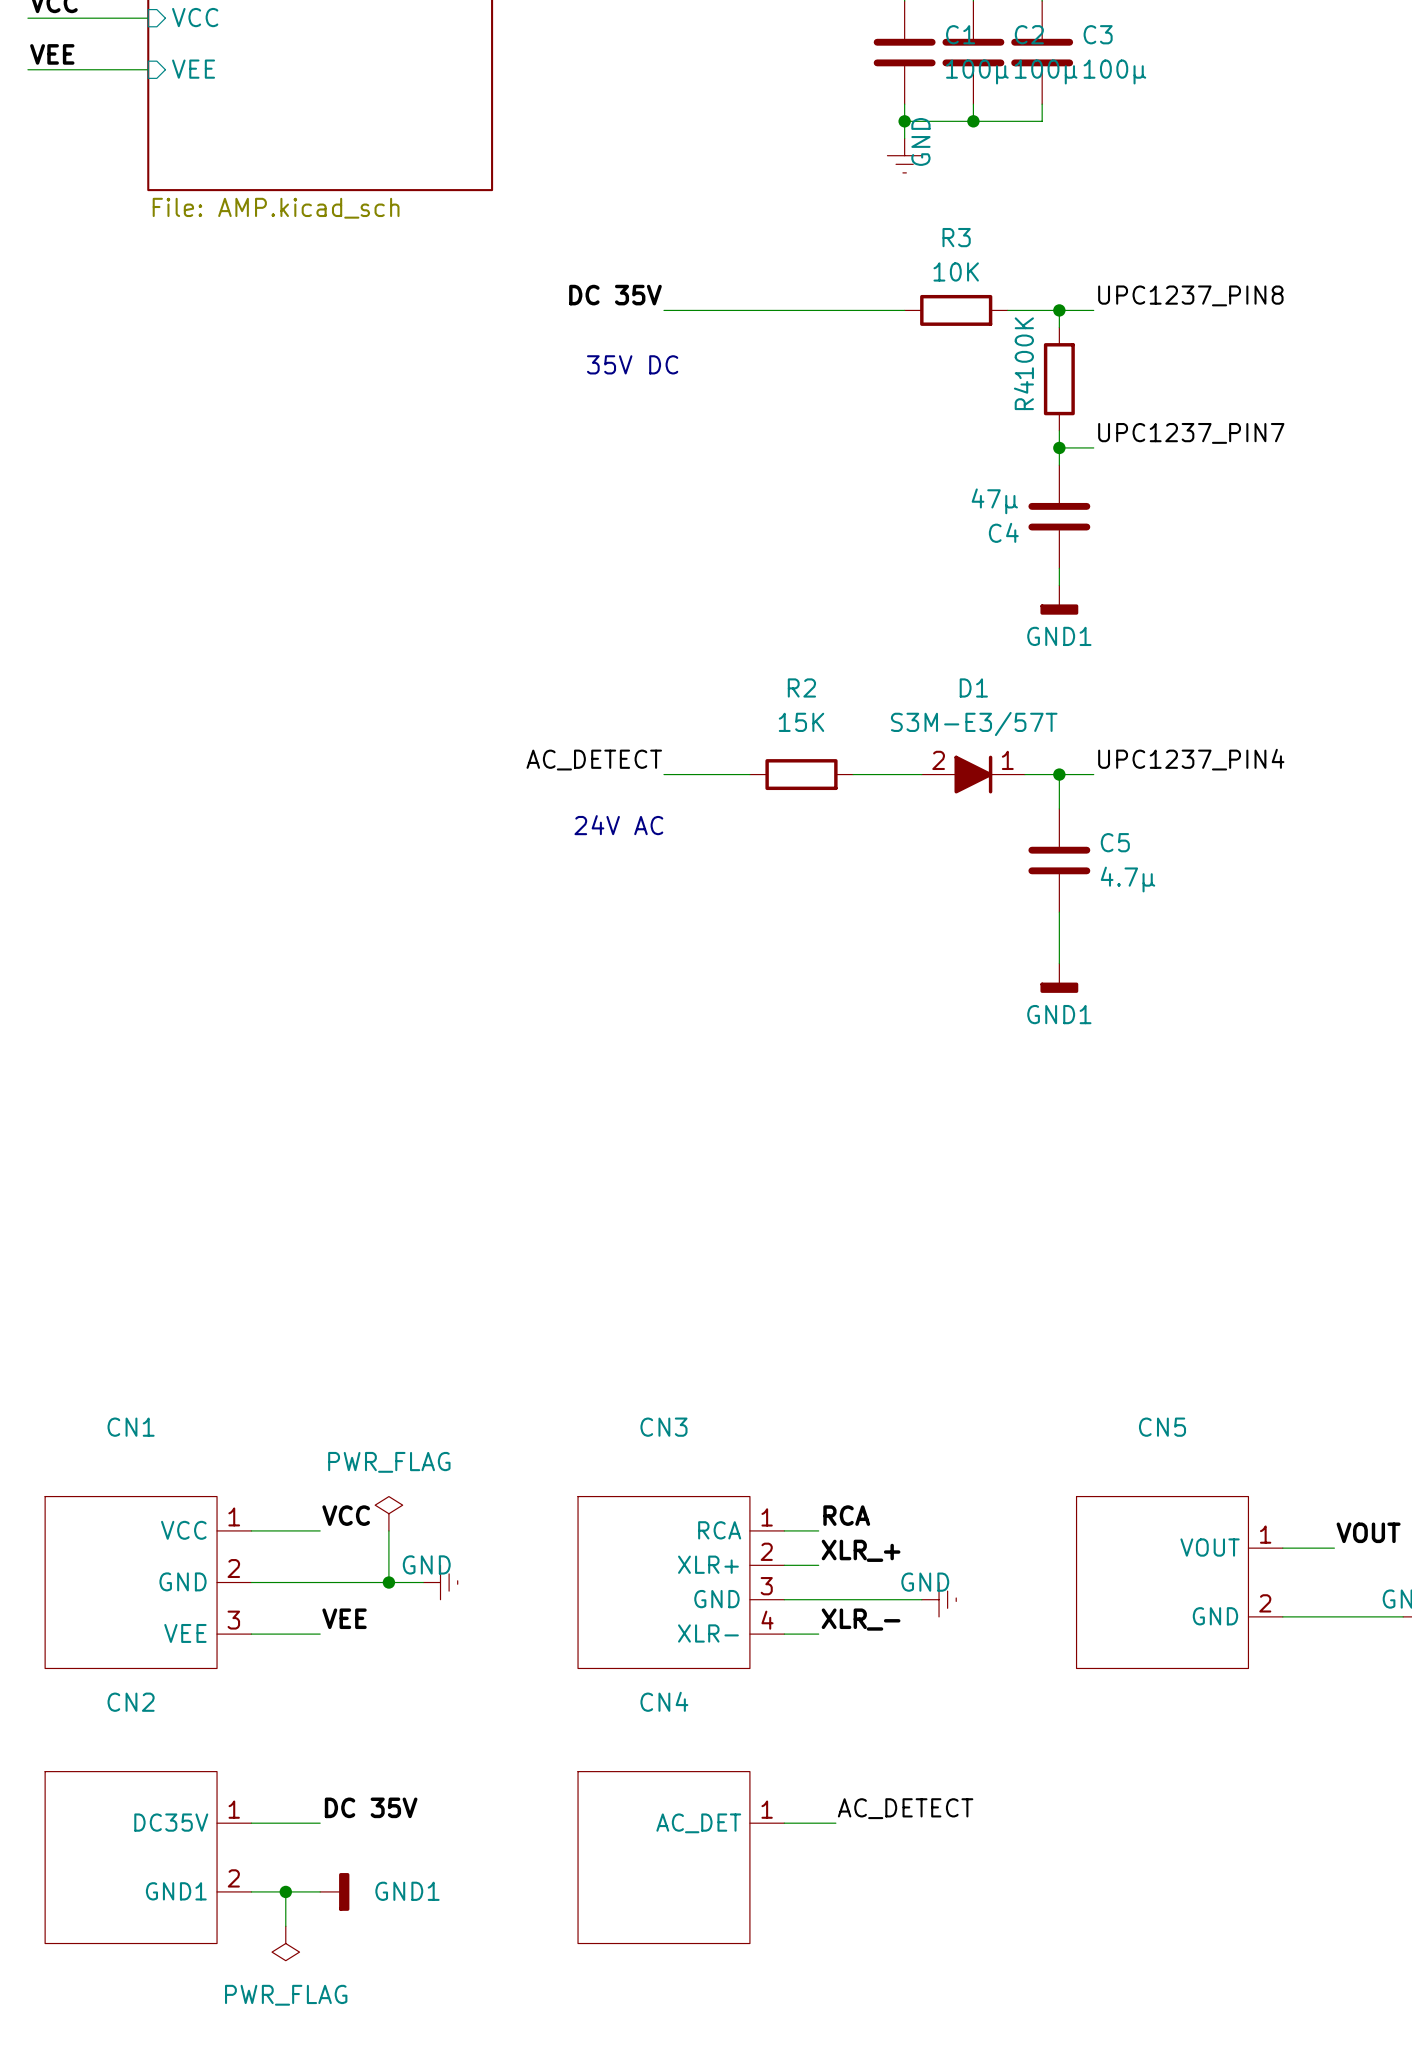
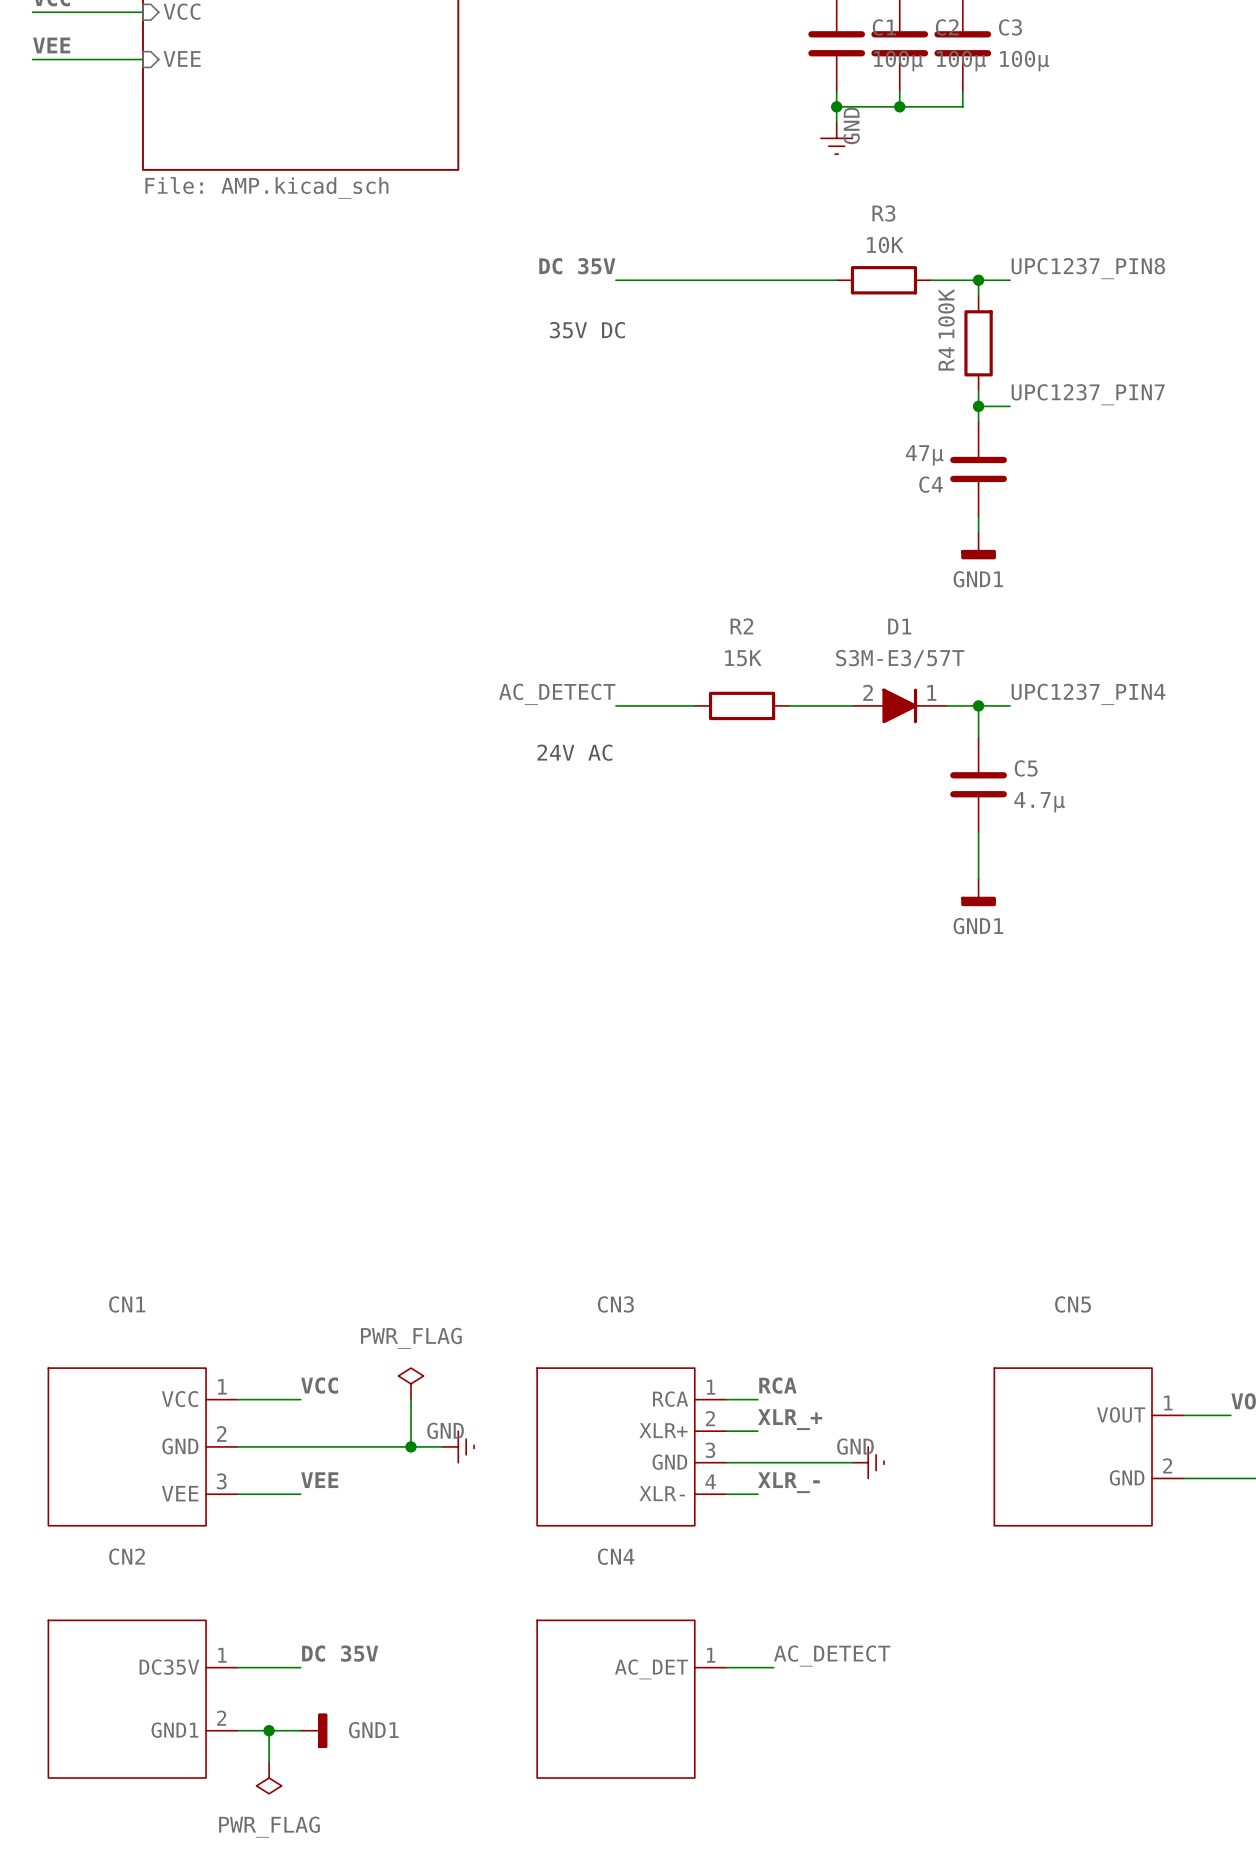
power symbol position: PWR_FLAG (388, 1513) -> PWR_FLAG (411, 1383)
wire: (388, 1530) (388, 1582) -> (411, 1399) (411, 1446)
junction position: (388, 1582) -> (411, 1446)
wire: none -> (395, 1446) (442, 1446)
power symbol position: GND (440, 1582) -> GND (458, 1446)

